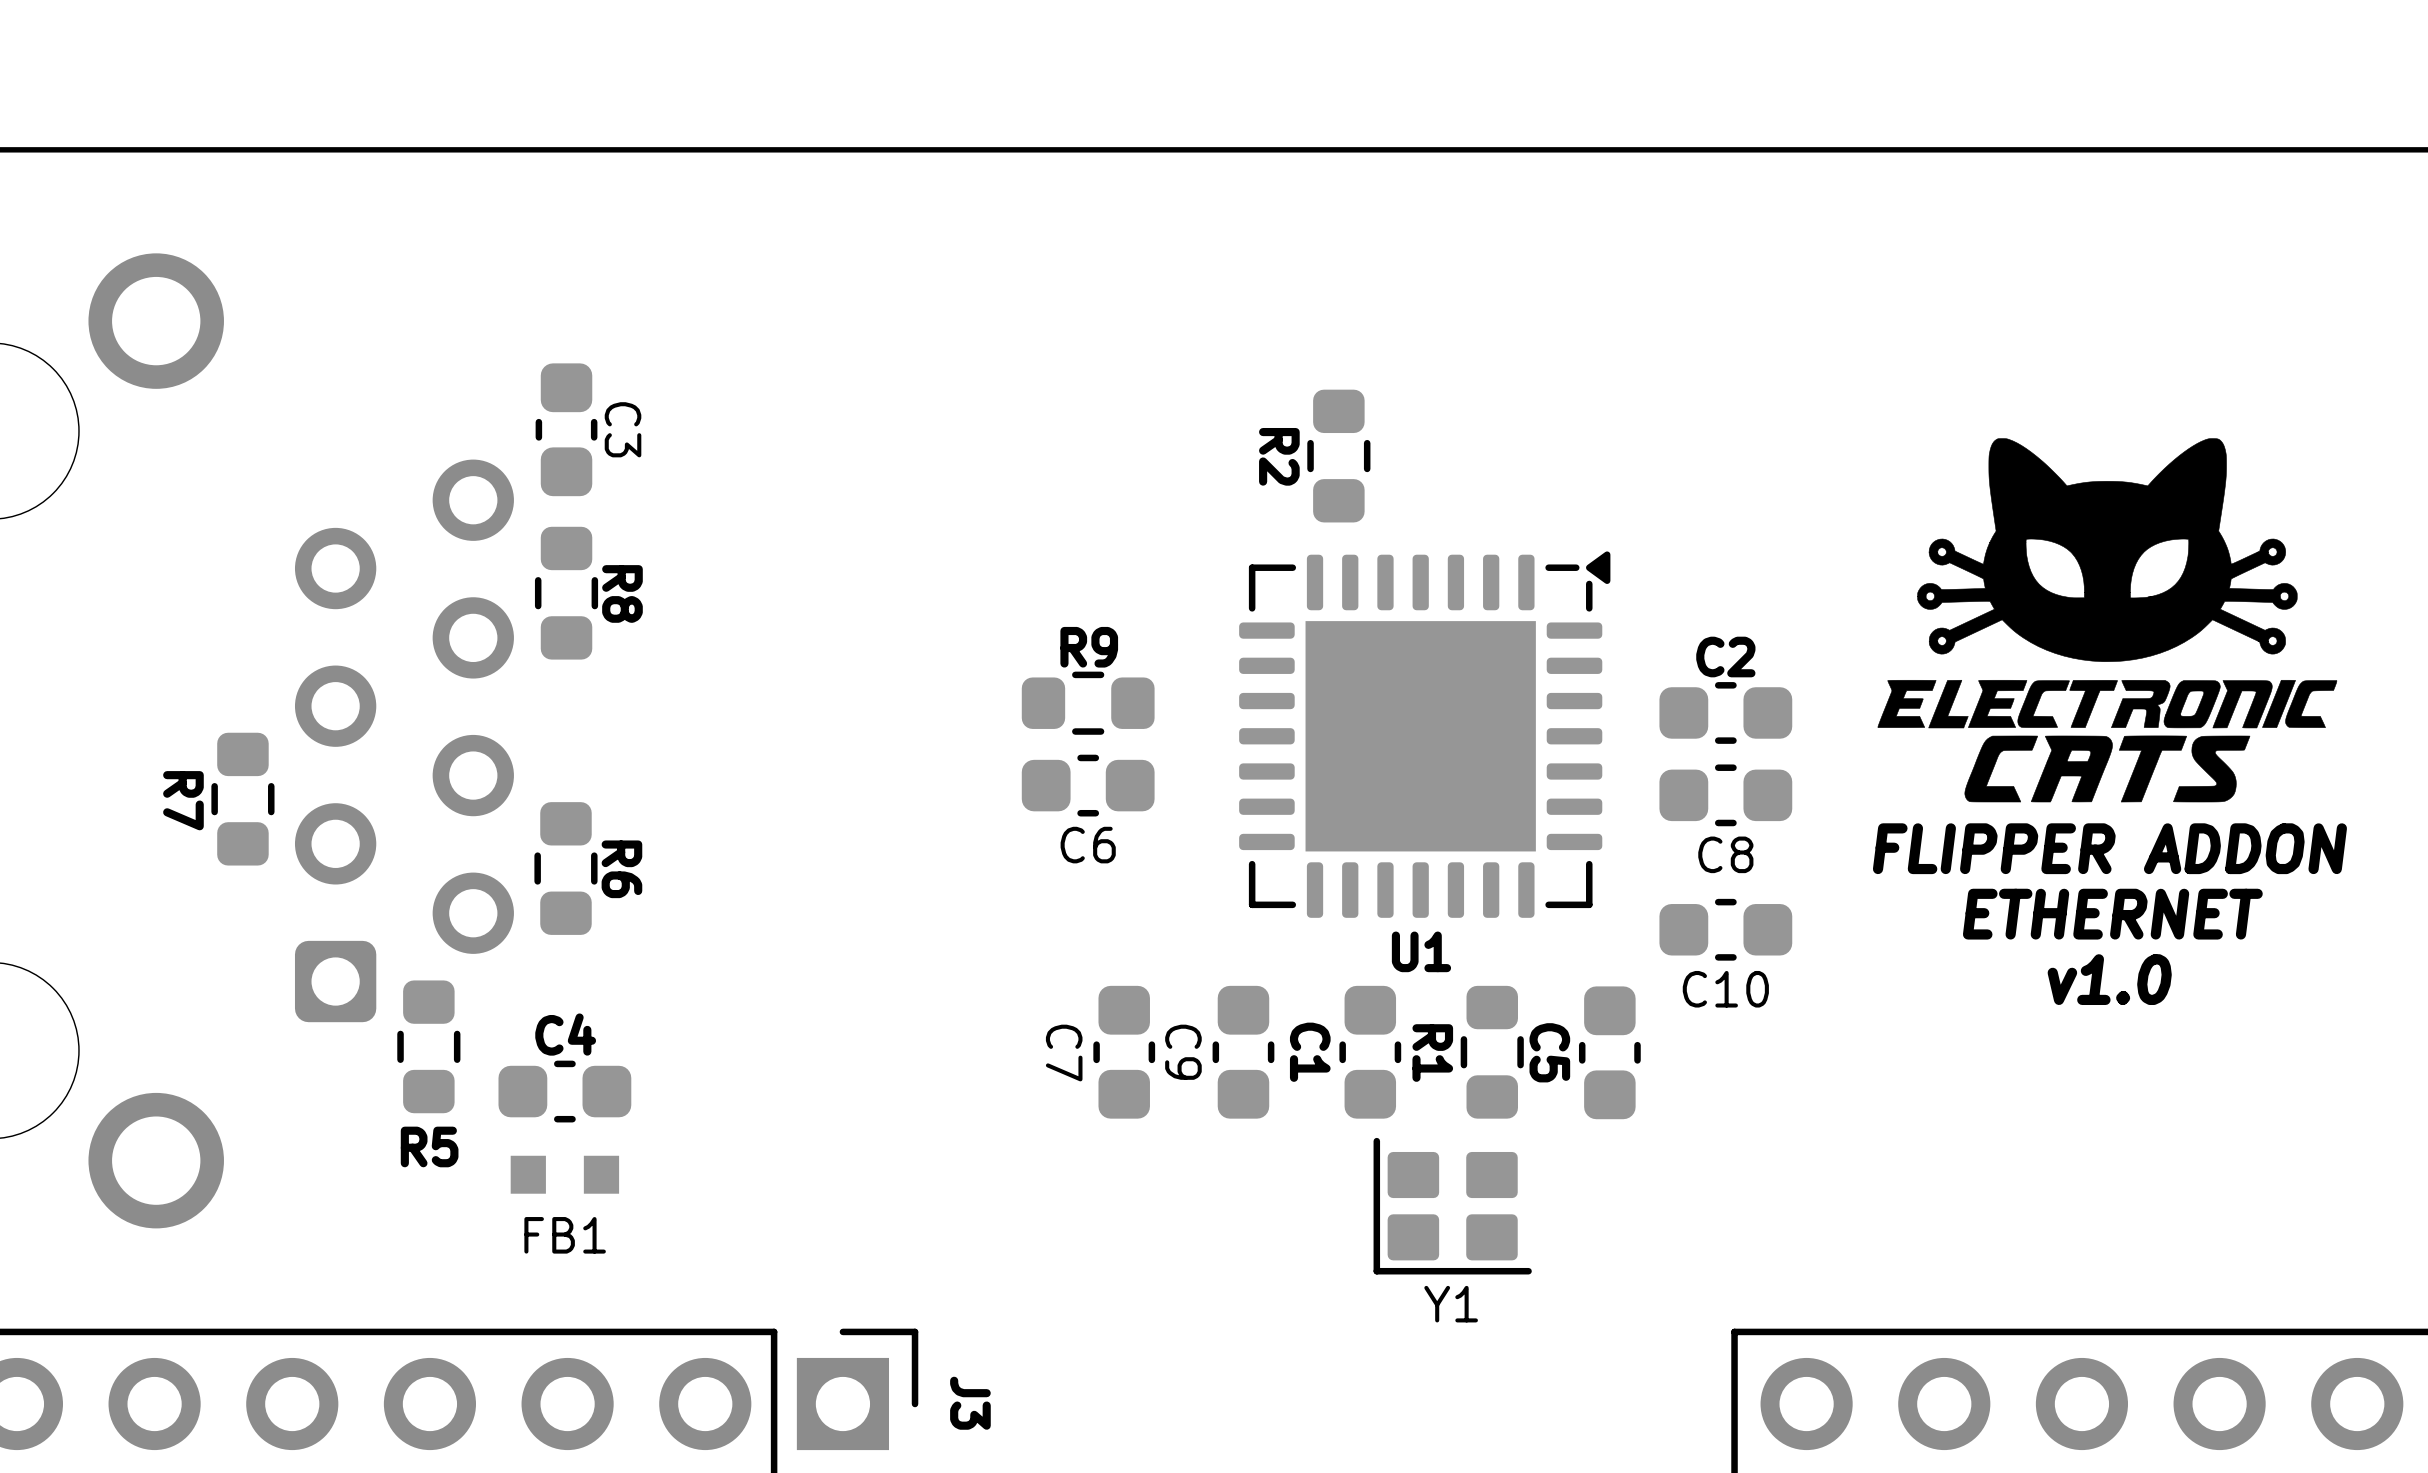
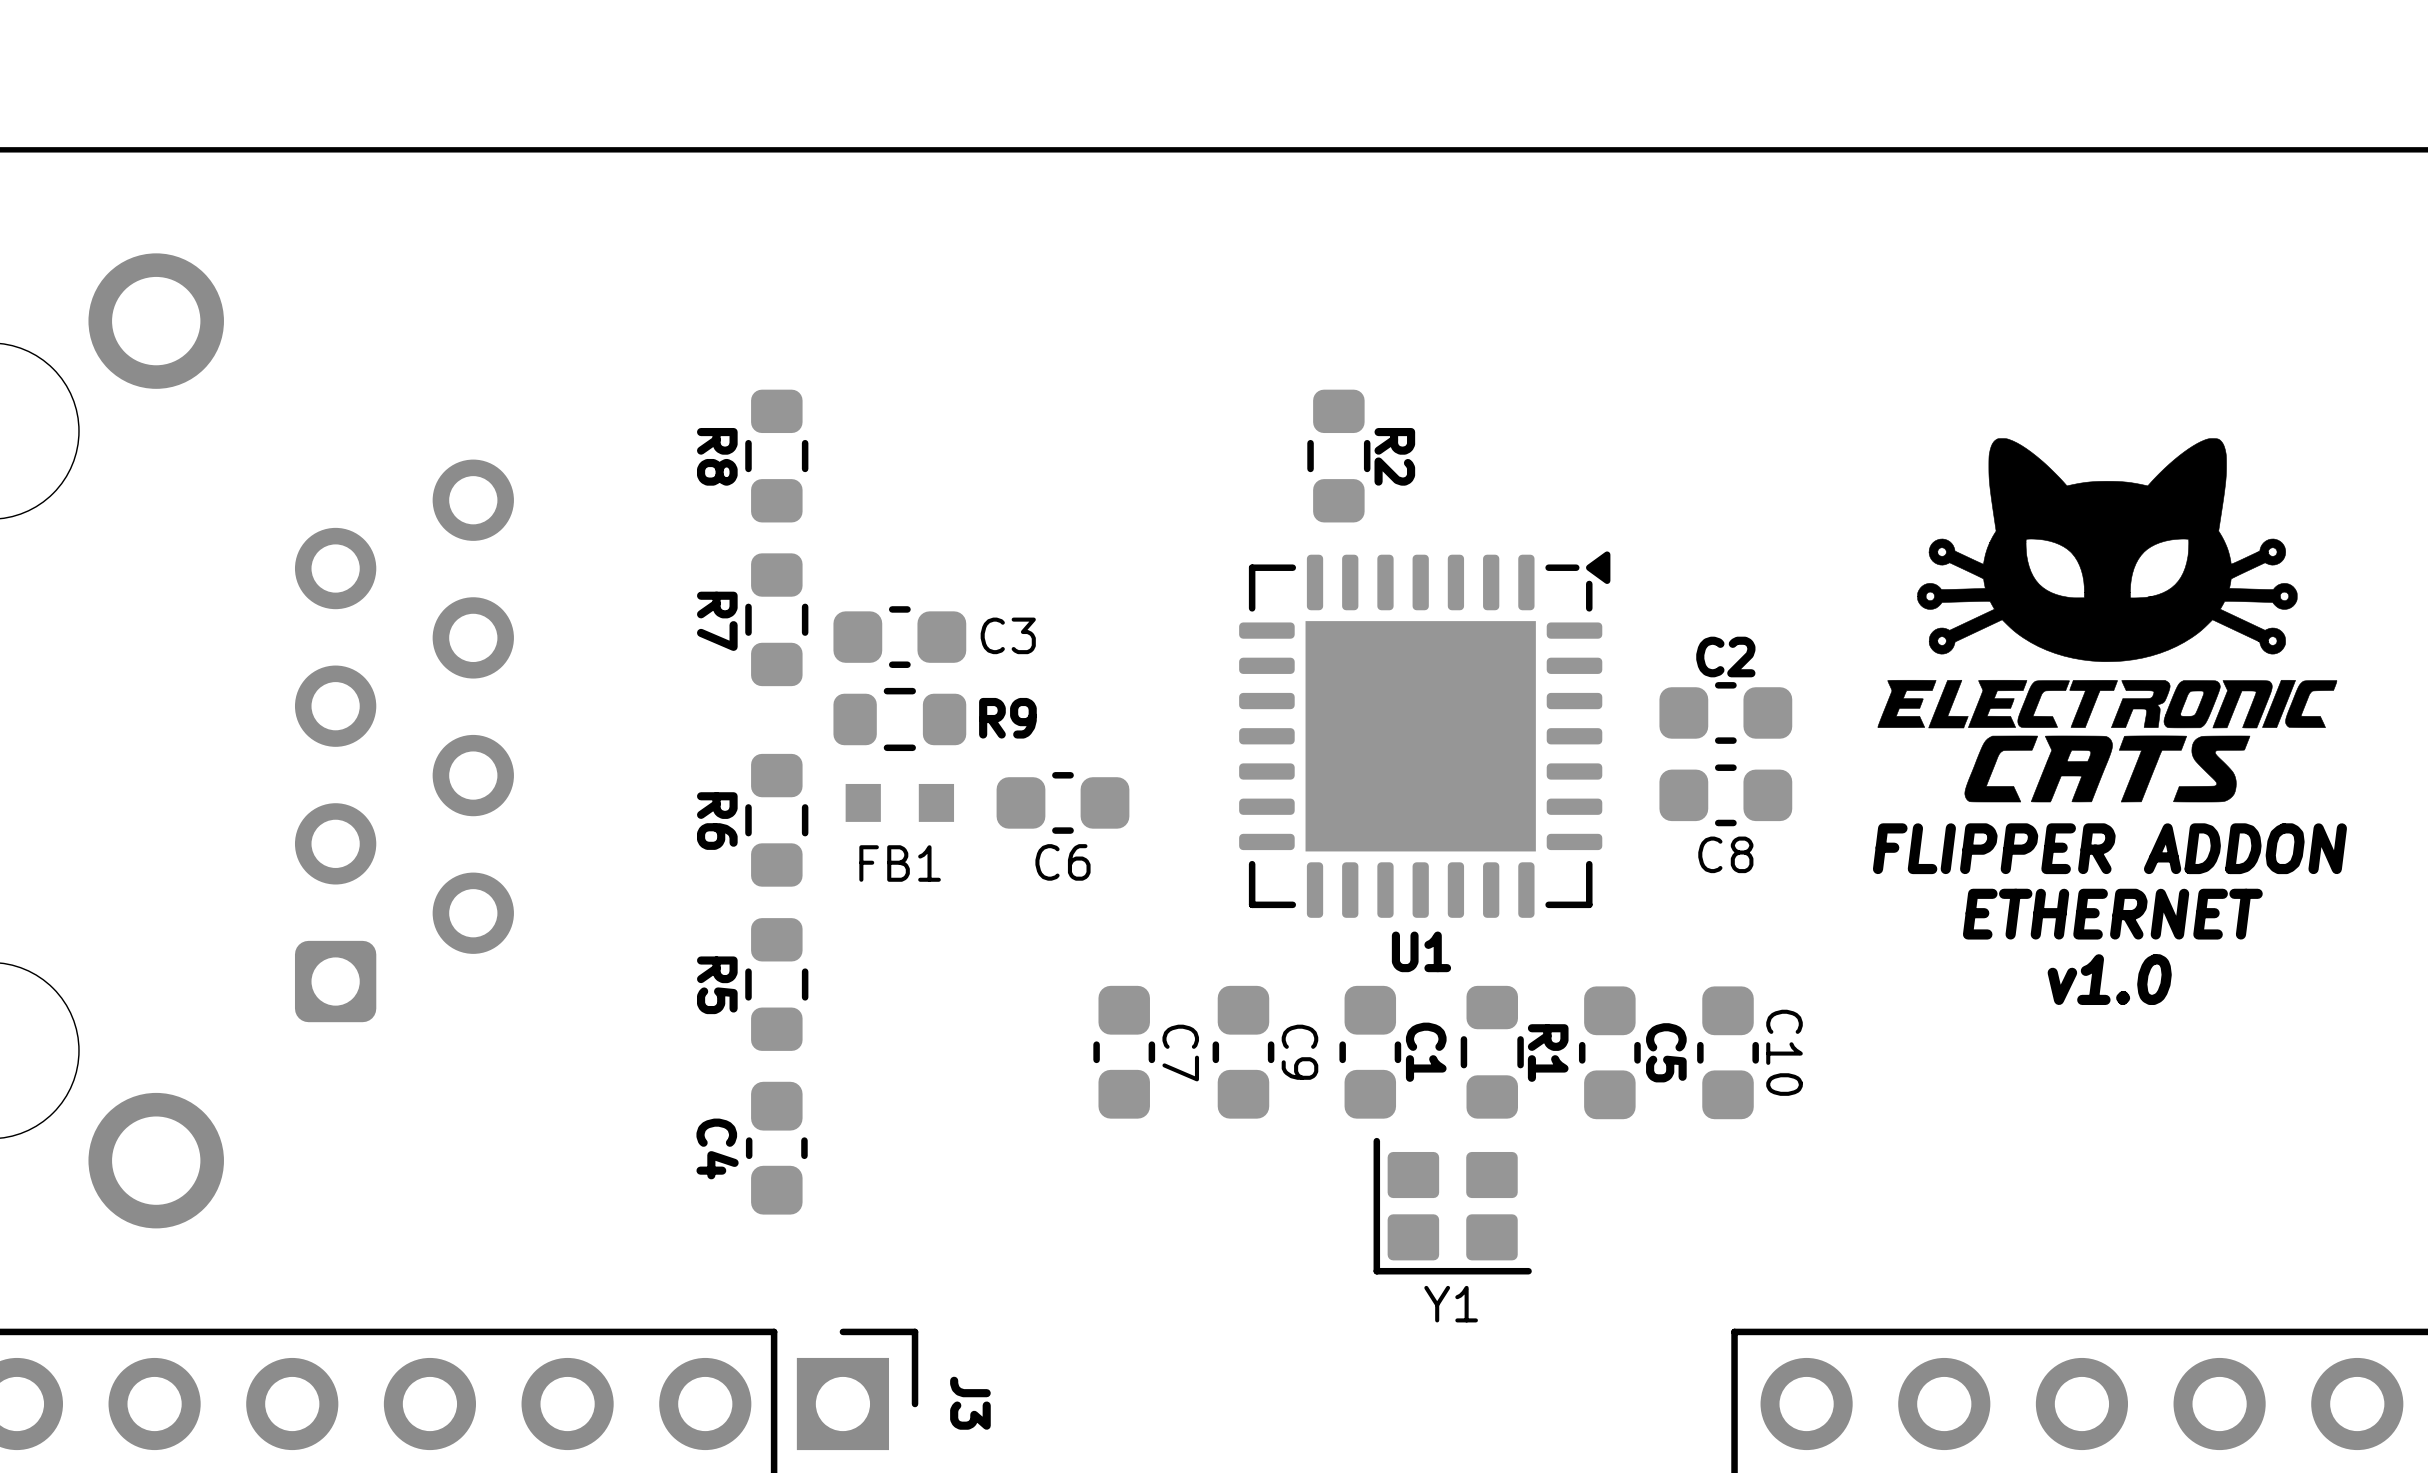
C3 rotation: 0° (566, 429) -> 90° clockwise (899, 637)
C3 position: (566, 429) -> (899, 637)
R2 name position: R2 (1279, 456) -> R2 (1394, 456)
R8 position: (566, 593) -> (776, 456)
R8 name position: R8 (622, 593) -> R8 (717, 456)
R9 name position: R9 (1089, 647) -> R9 (1007, 718)
R9 position: (1088, 703) -> (899, 719)
C6 position: (1088, 785) -> (1062, 802)
R7 position: (242, 799) -> (776, 619)
R6 position: (565, 868) -> (776, 820)
R6 name position: R6 (621, 869) -> R6 (717, 821)
C10 rotation: 0° (1725, 929) -> 90° clockwise (1728, 1052)
C10 position: (1725, 929) -> (1728, 1052)
R5 position: (428, 1046) -> (776, 984)
C9 name position: C9 (1183, 1052) -> C9 (1299, 1052)
C1 name position: C1 (1310, 1052) -> C1 (1426, 1052)
C5 name position: C5 (1549, 1052) -> C5 (1666, 1052)
C7 name position: C7 (1064, 1053) -> C7 (1180, 1053)
R1 name position: R1 (1432, 1053) -> R1 (1548, 1053)
C4 rotation: 0° (564, 1091) -> 90° clockwise (776, 1148)
C4 position: (564, 1091) -> (776, 1148)
R5 name rotation: 0° (429, 1146) -> 90° clockwise (717, 985)
R5 name position: R5 (429, 1146) -> R5 (717, 985)
FB1 position: (564, 1174) -> (899, 802)

